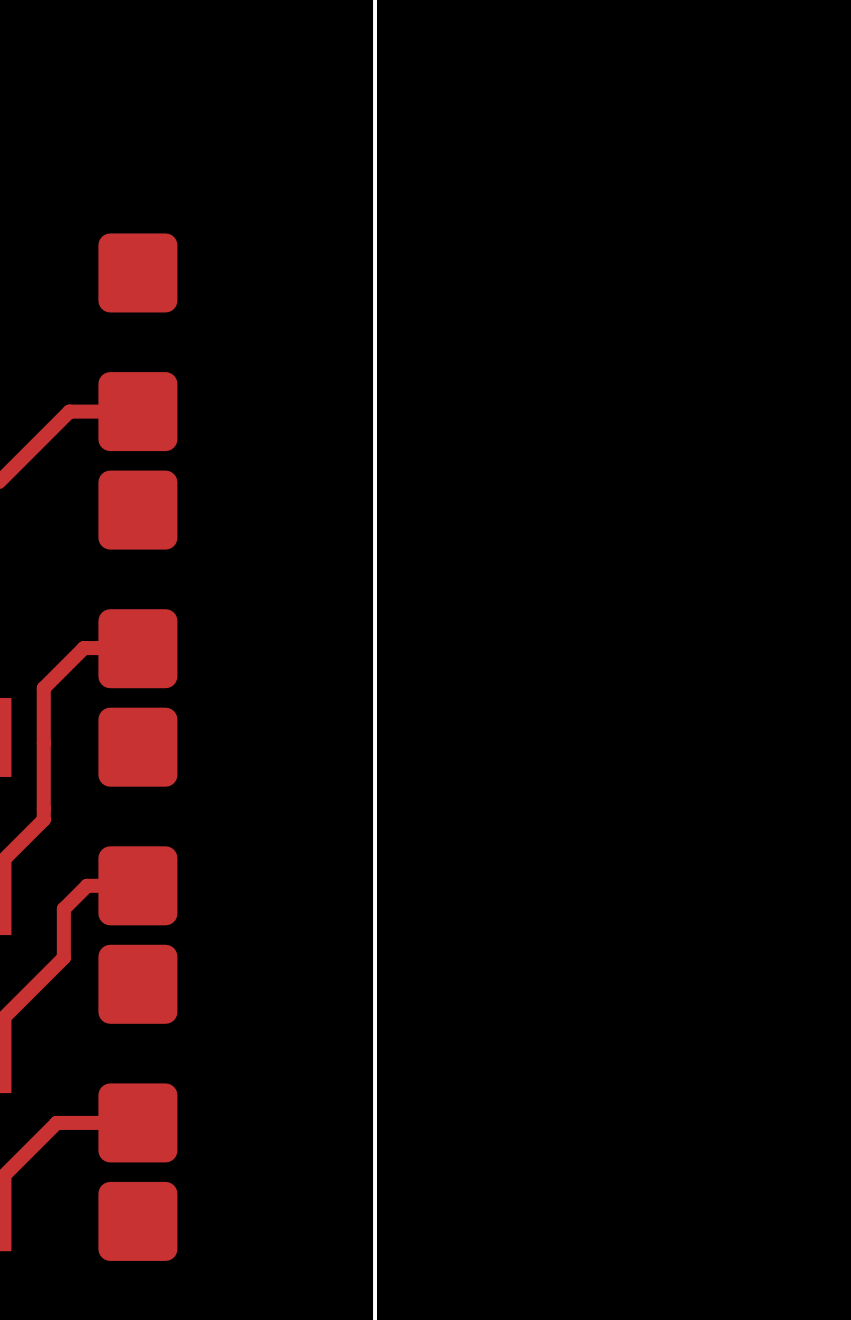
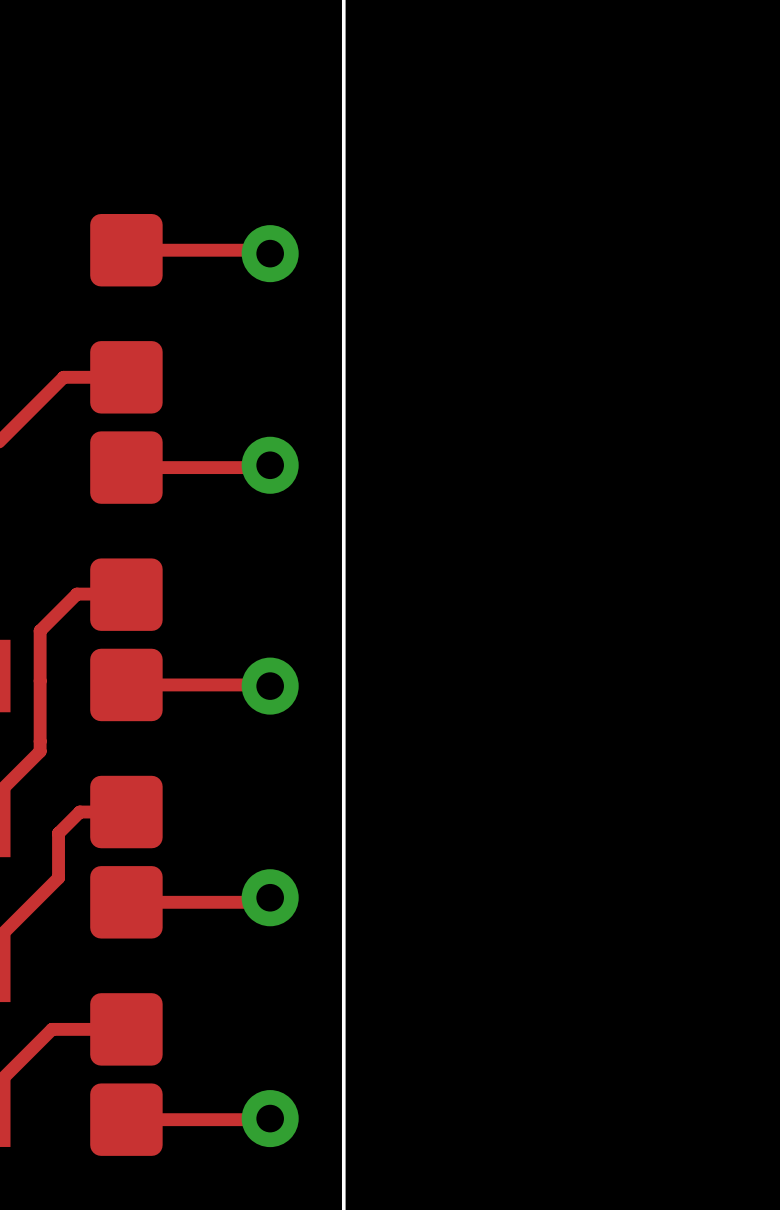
top track: none -> (126, 250) (266, 250) (270, 253)
via: none -> (270, 253)
top track: none -> (270, 465) (267, 467) (126, 467)
via: none -> (270, 465)
top track: none -> (126, 684) (270, 686)
via: none -> (270, 686)
top track: none -> (270, 897) (265, 902) (126, 902)
via: none -> (270, 897)
top track: none -> (270, 1118) (126, 1119)
via: none -> (270, 1118)

